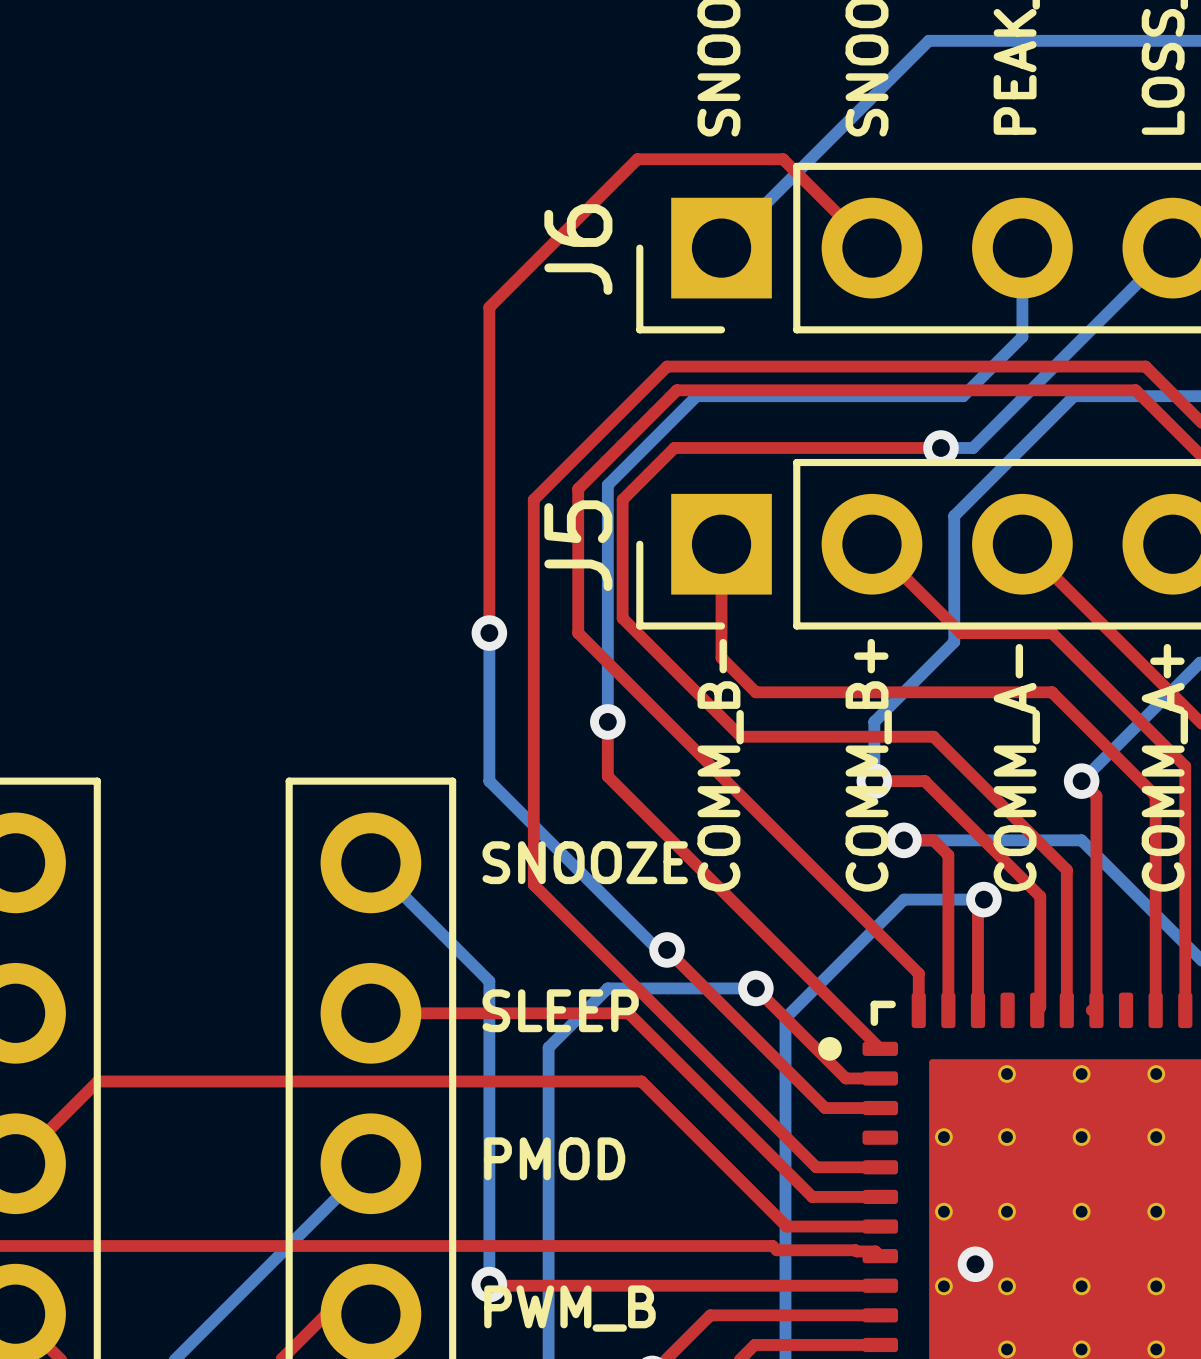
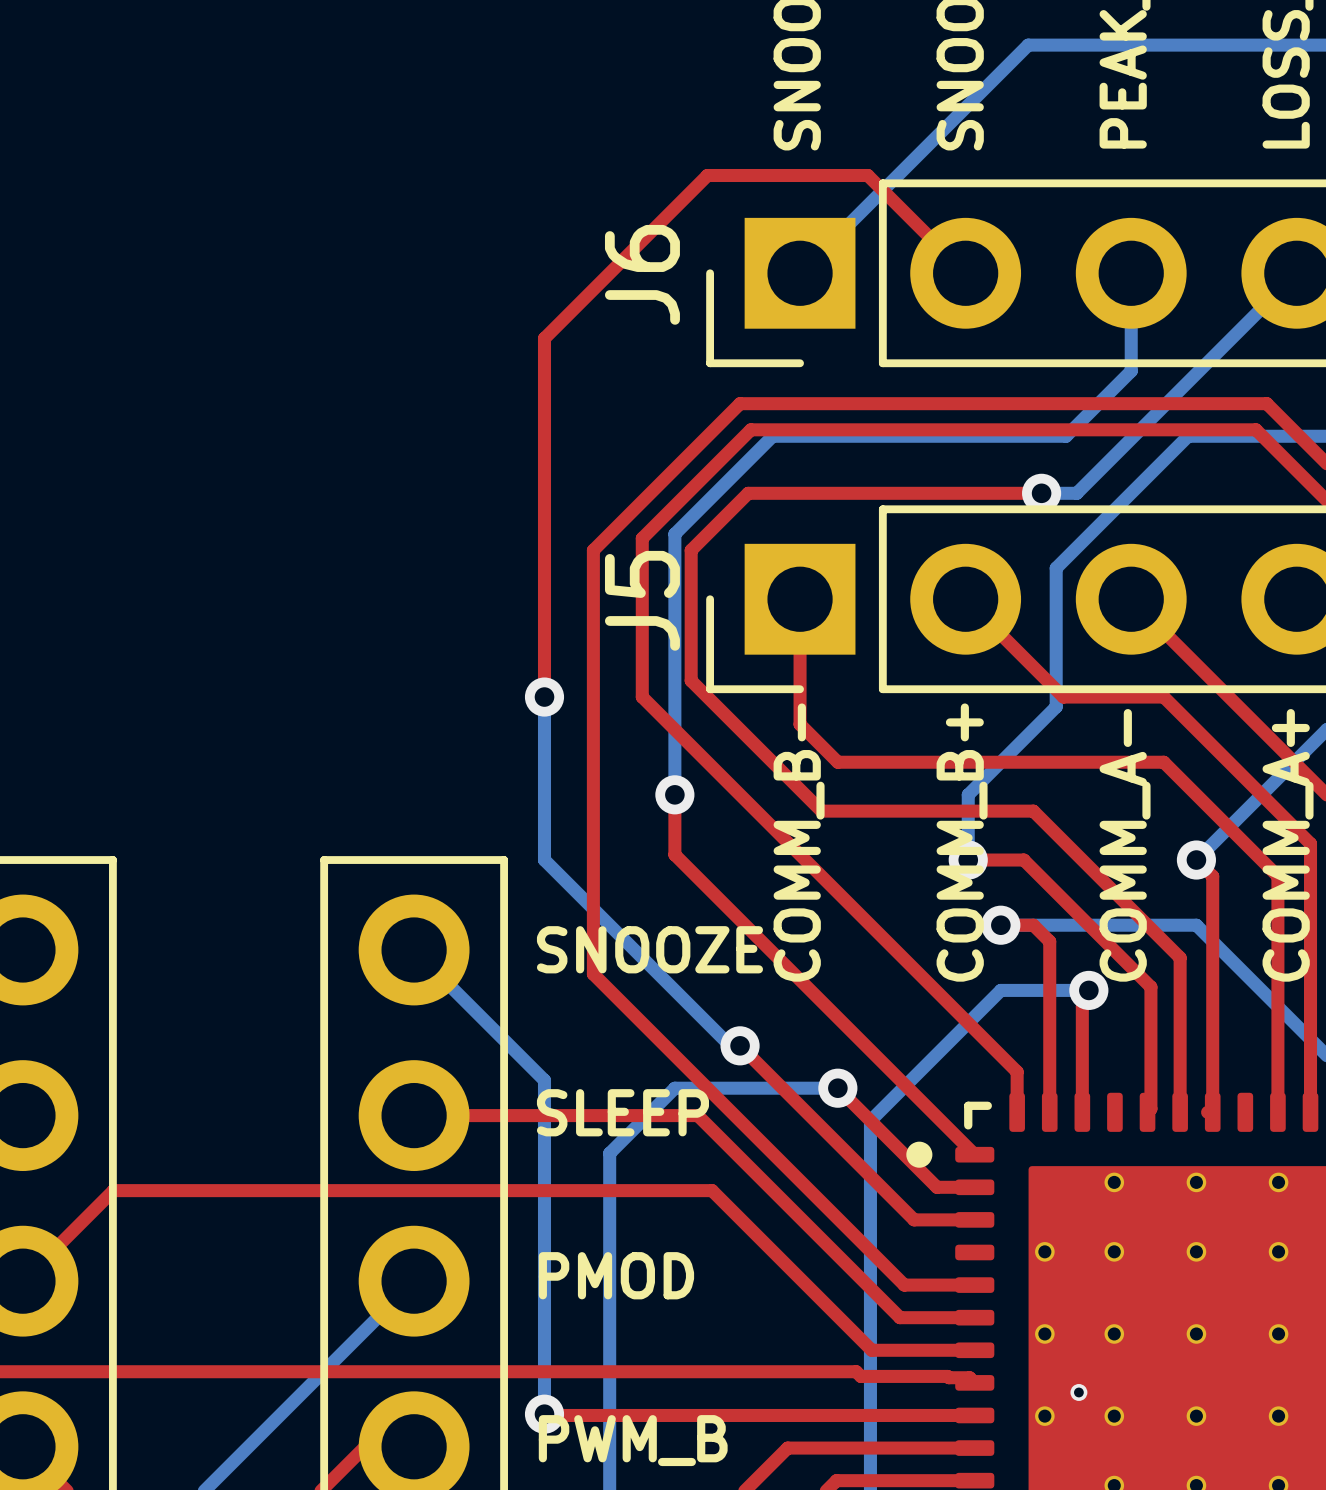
via size: [957, 1246, 994, 1283] -> [1070, 1384, 1088, 1401]

